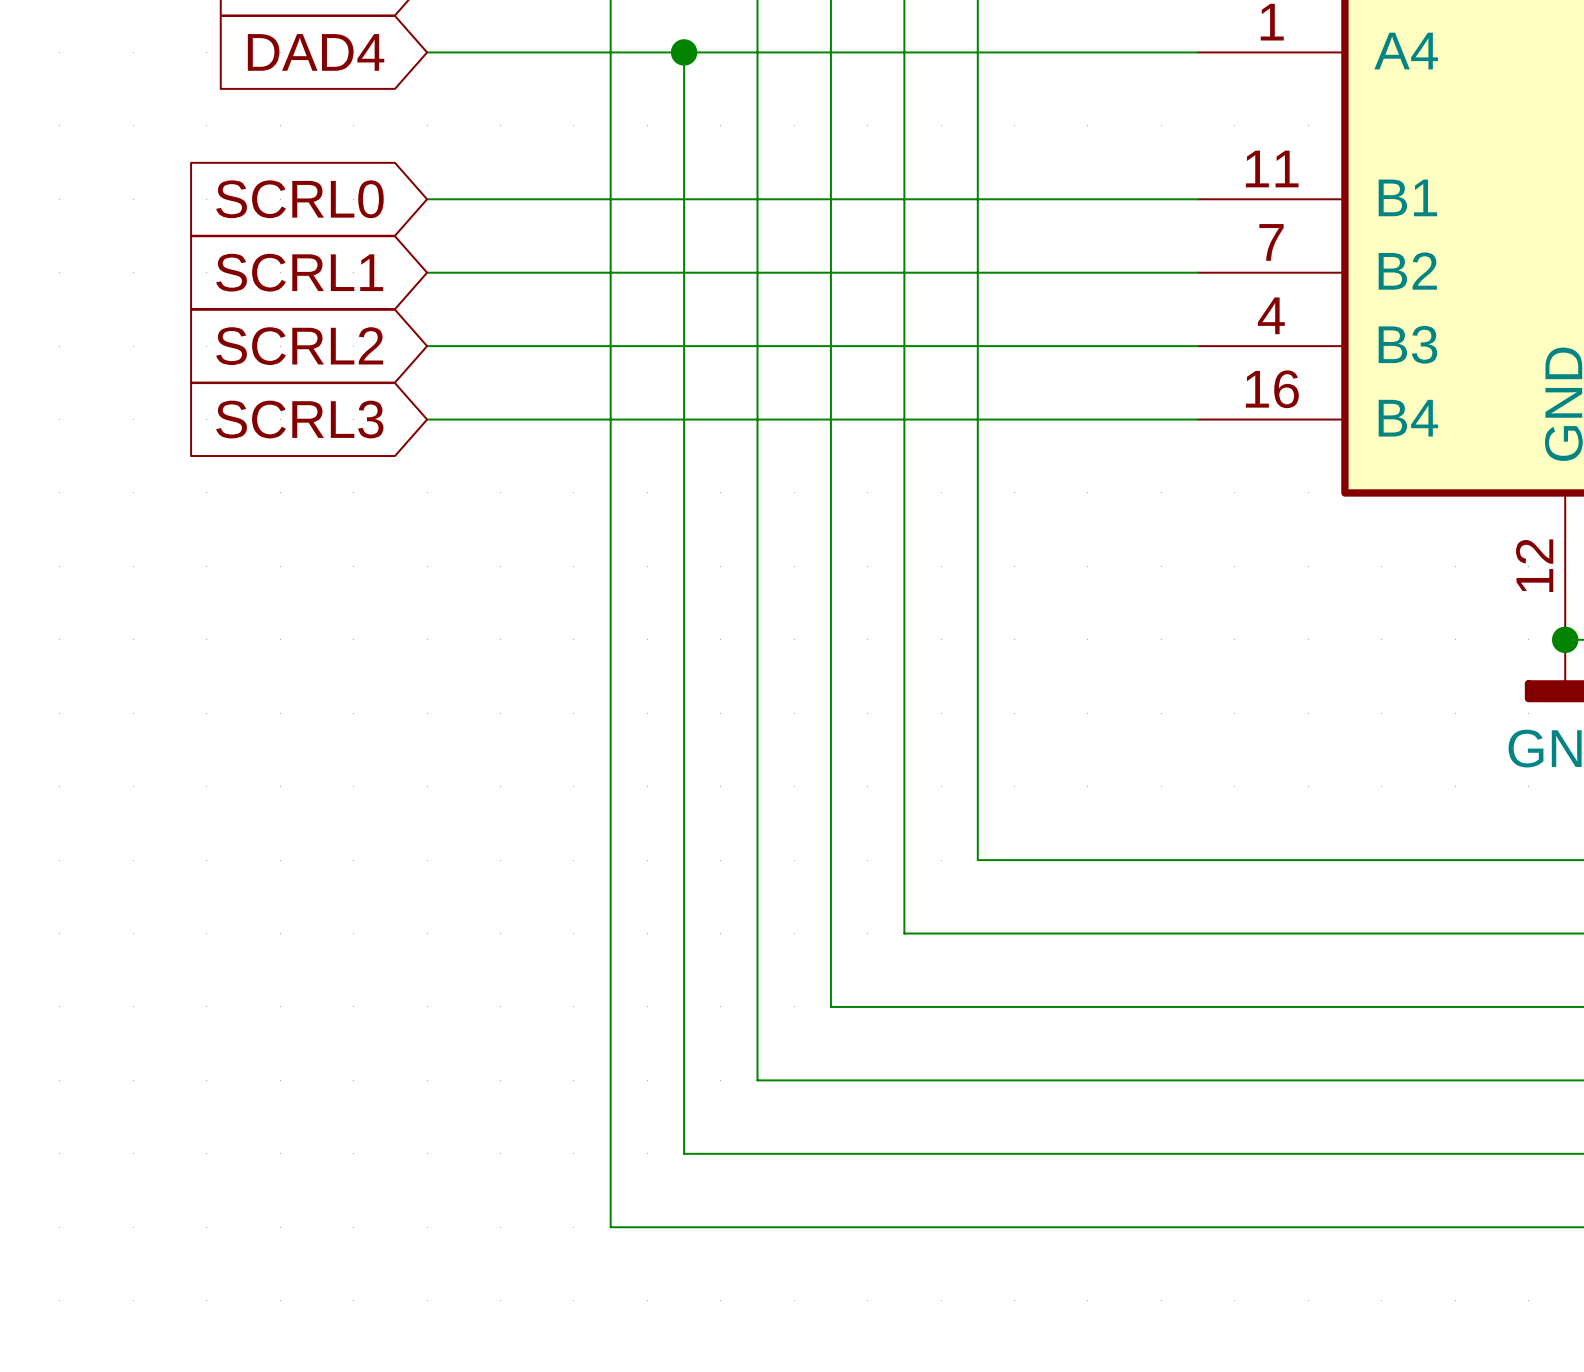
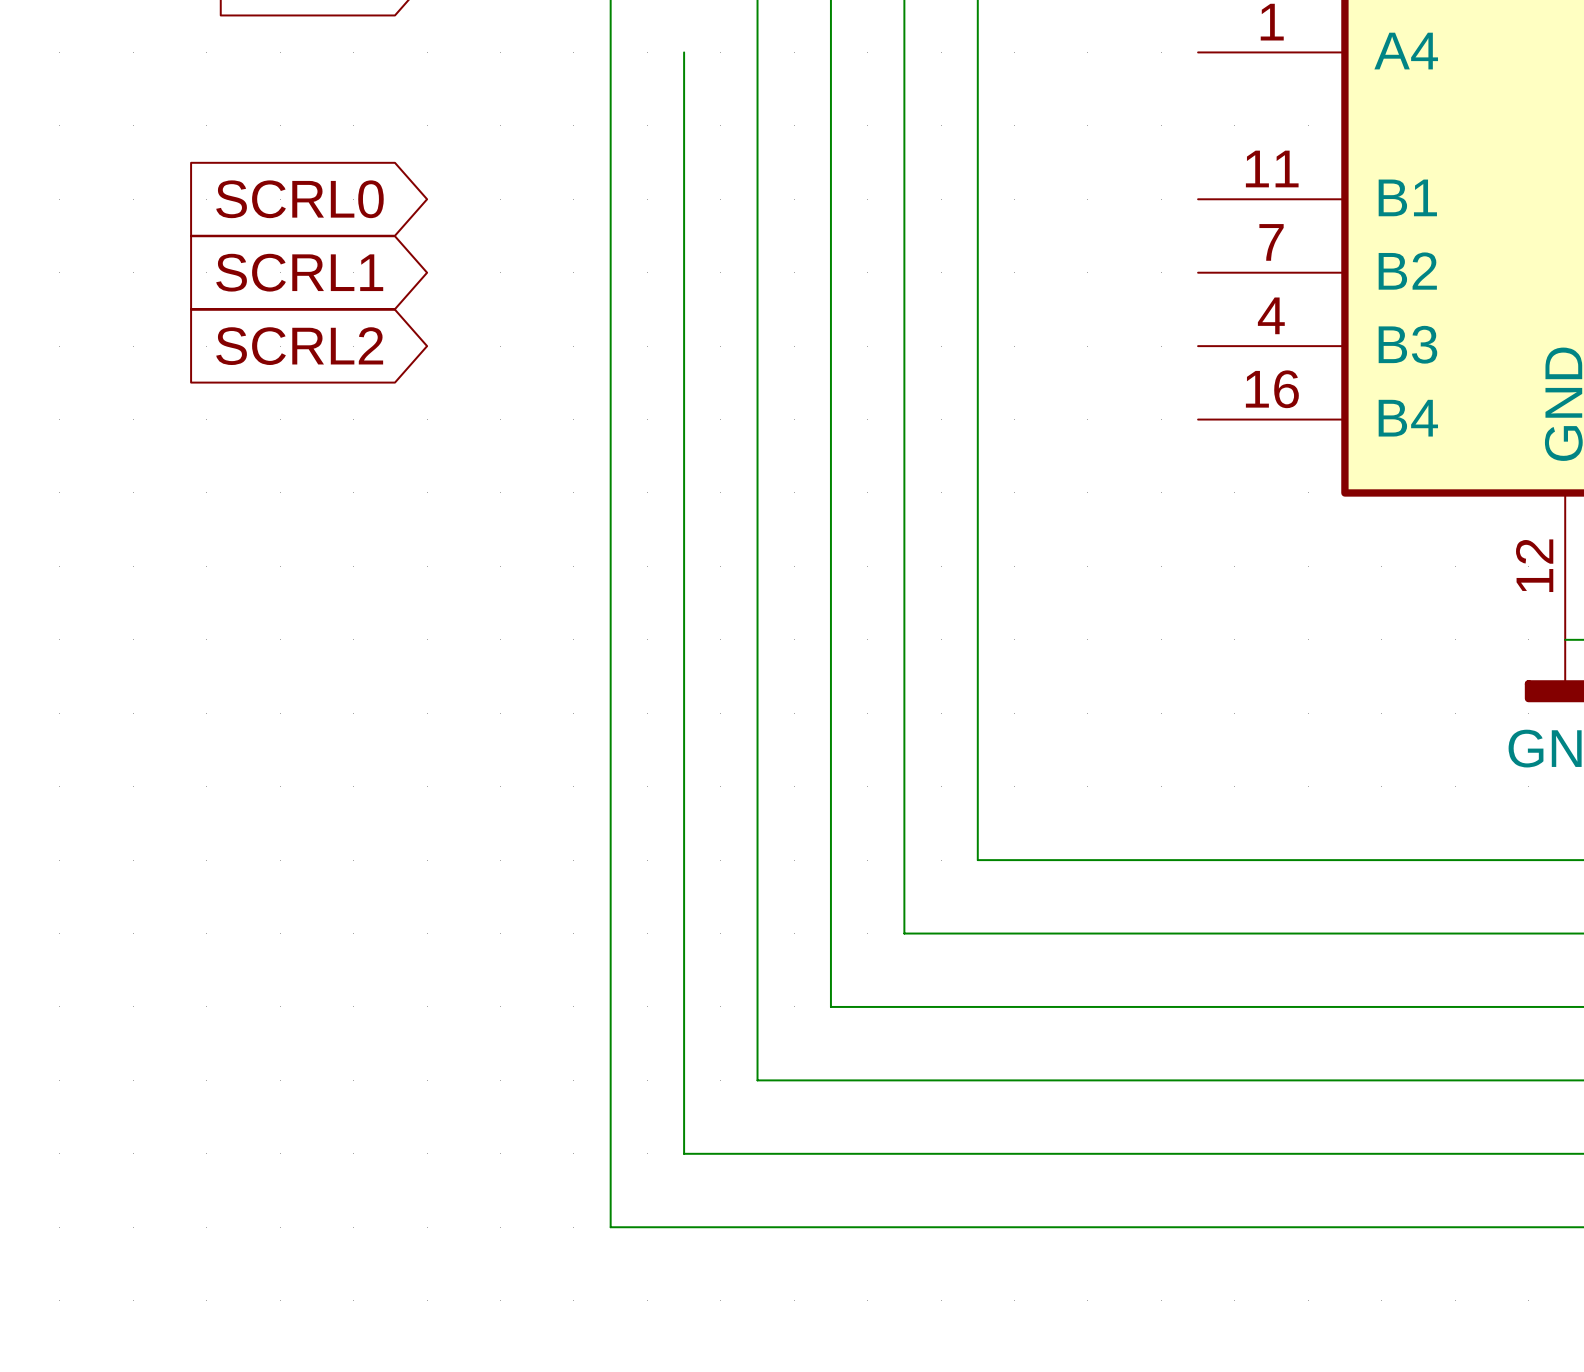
global label: DAD4 (316, 52) -> none
wire: (427, 52) (1198, 52) -> none
junction: (684, 52) -> none
wire: (427, 199) (1198, 199) -> none
wire: (427, 272) (1198, 272) -> none
wire: (427, 346) (1198, 346) -> none
global label: SCRL3 (299, 419) -> none
wire: (427, 419) (1198, 419) -> none
junction: (1565, 639) -> none

